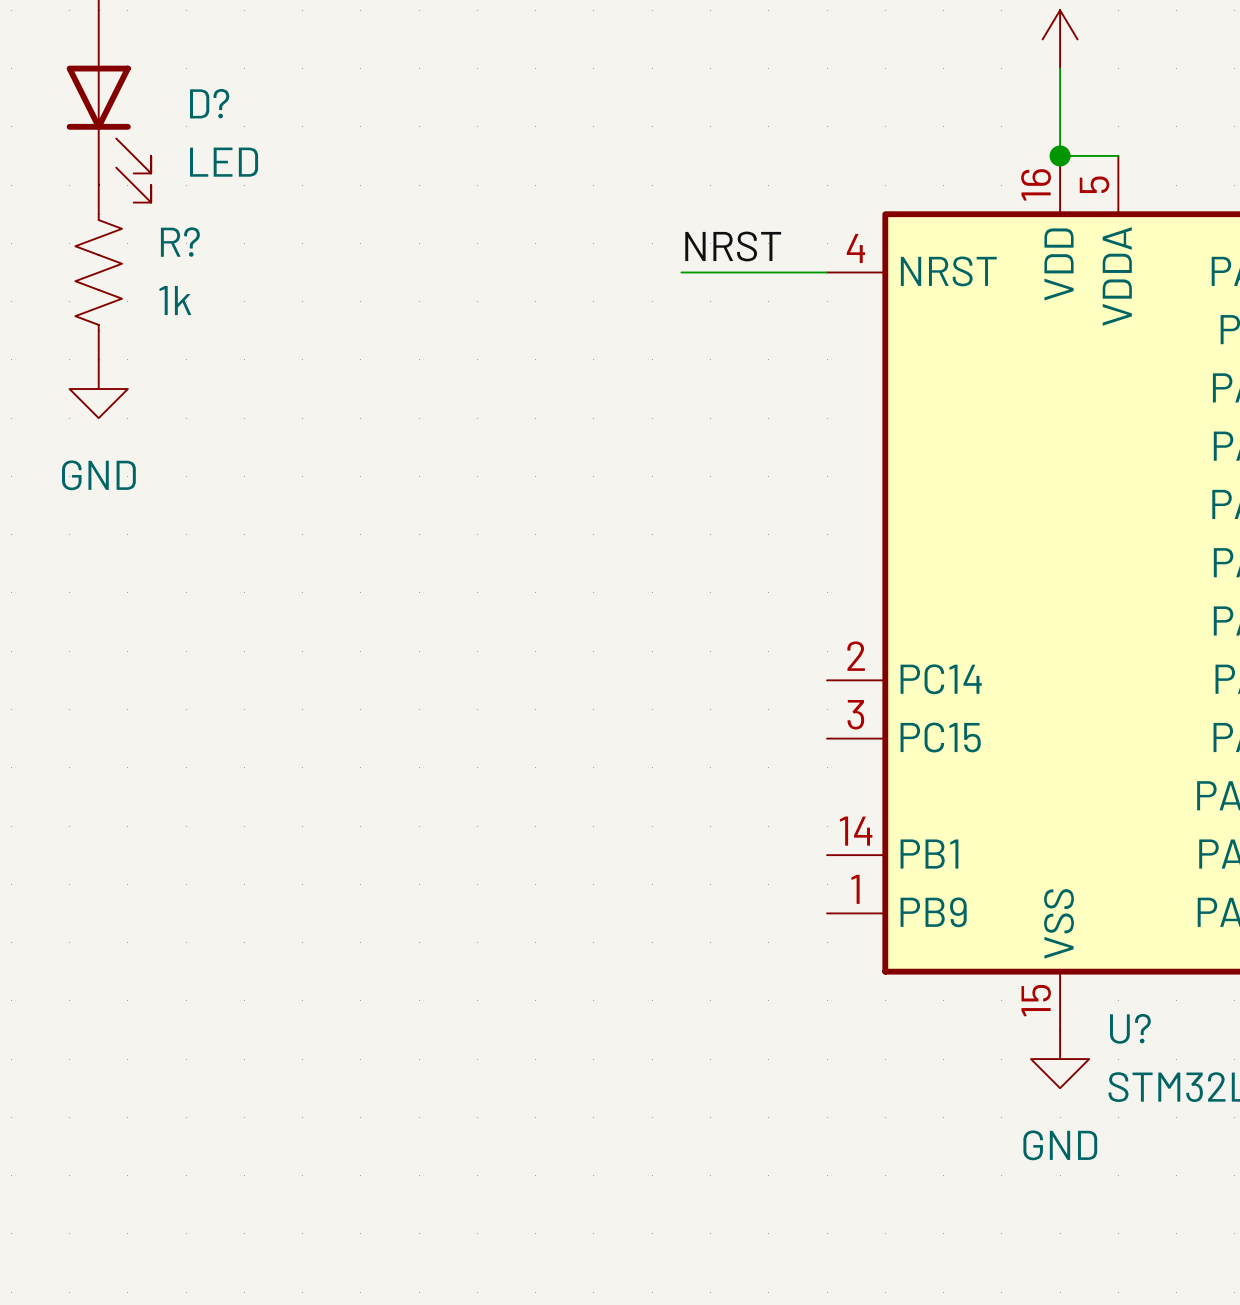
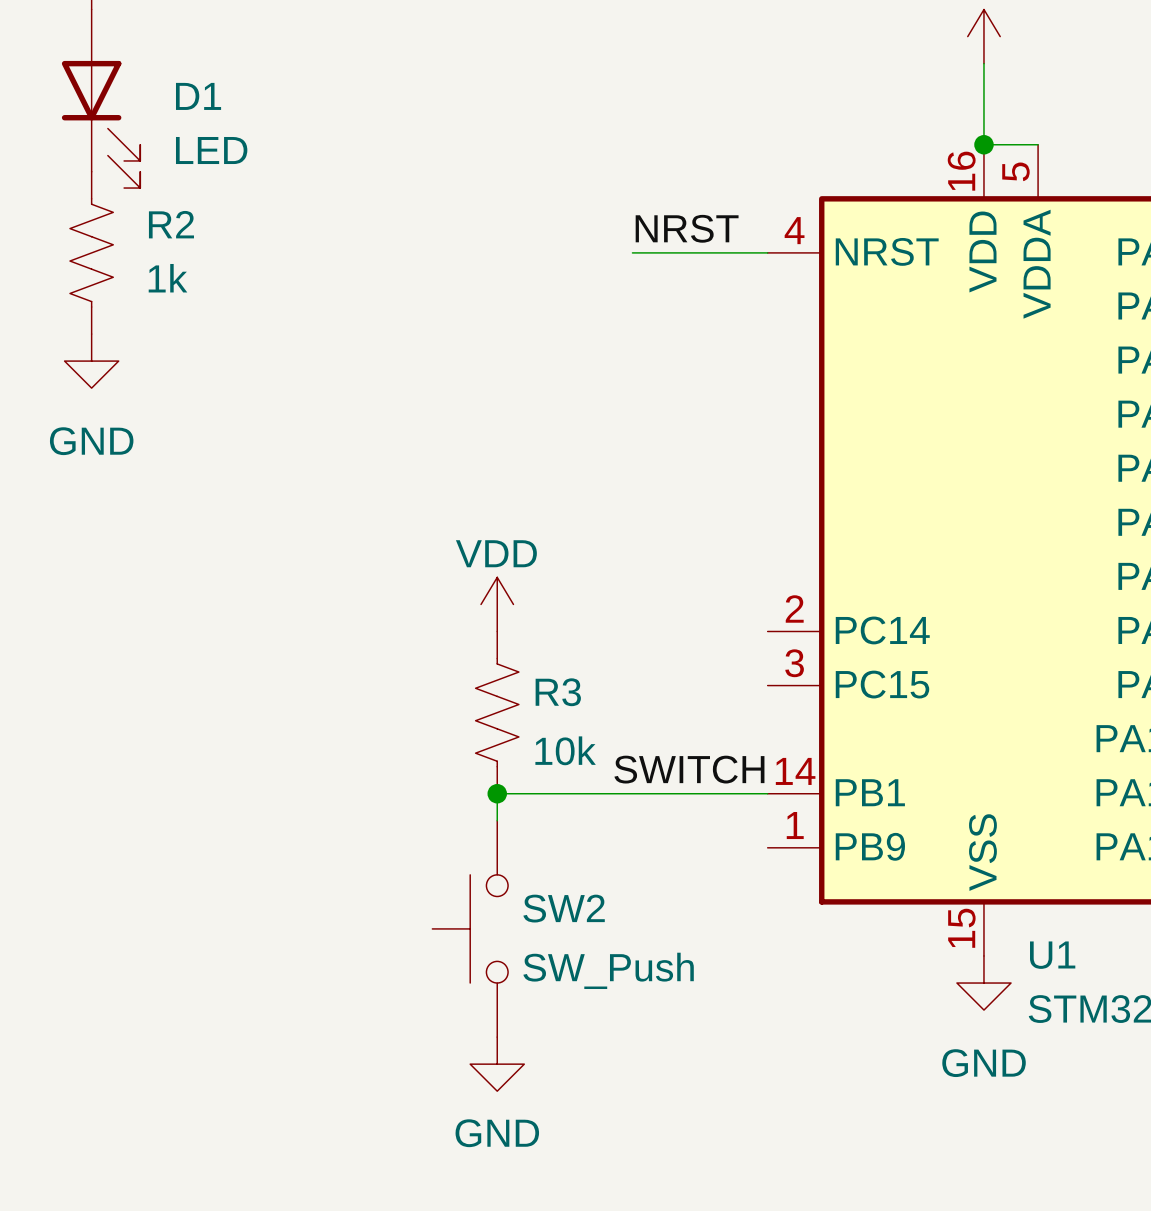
D? name: D? (209, 103) -> D1 (198, 96)
R? name: R? (180, 242) -> R2 (171, 224)
power symbol: none -> VDD (497, 604)
R3: none -> 10k (497, 712)
label: none -> SWITCH (689, 769)
junction: none -> (497, 793)
wire: none -> (767, 793) (497, 793) (497, 820)
SW2: none -> SW_Push (470, 928)
U? name: U? (1130, 1028) -> U1 (1052, 955)
power symbol: none -> GND (497, 1064)

